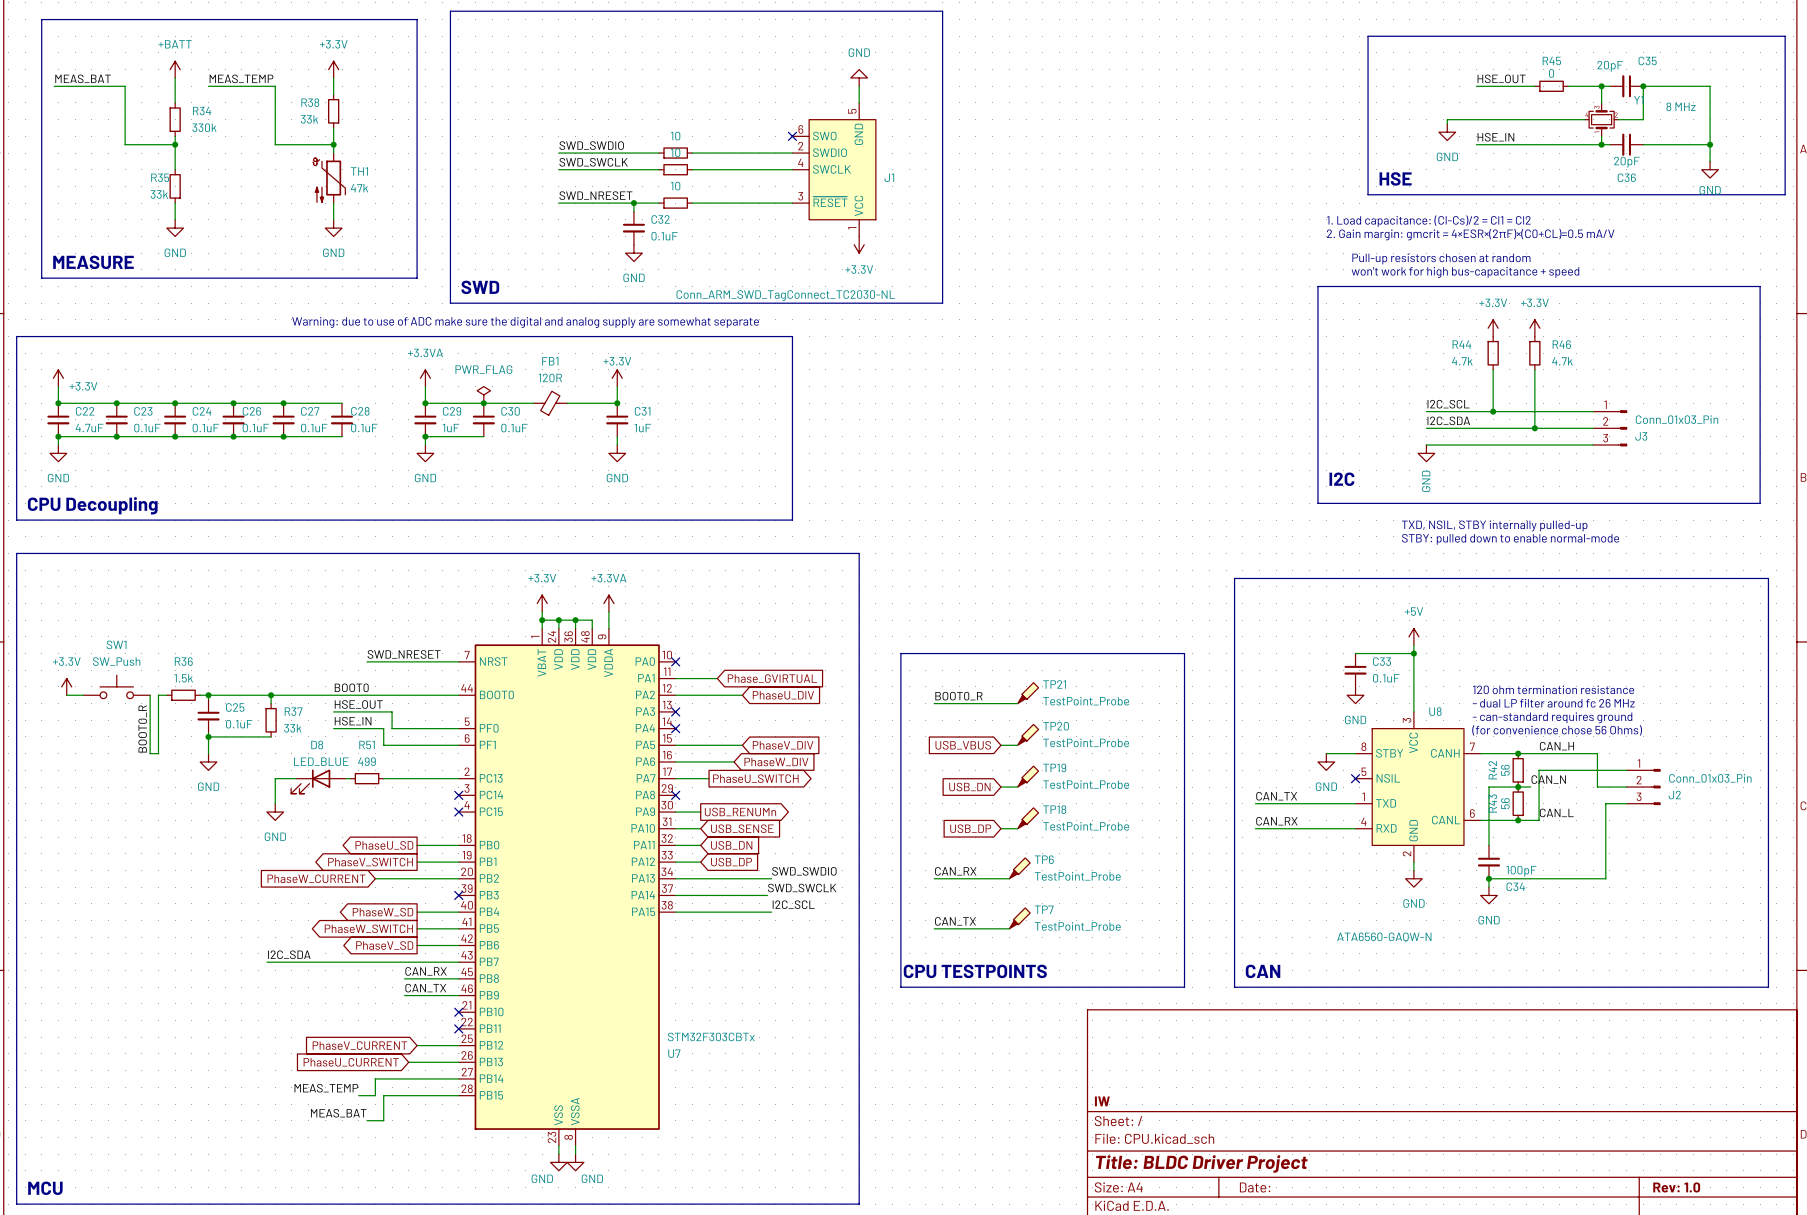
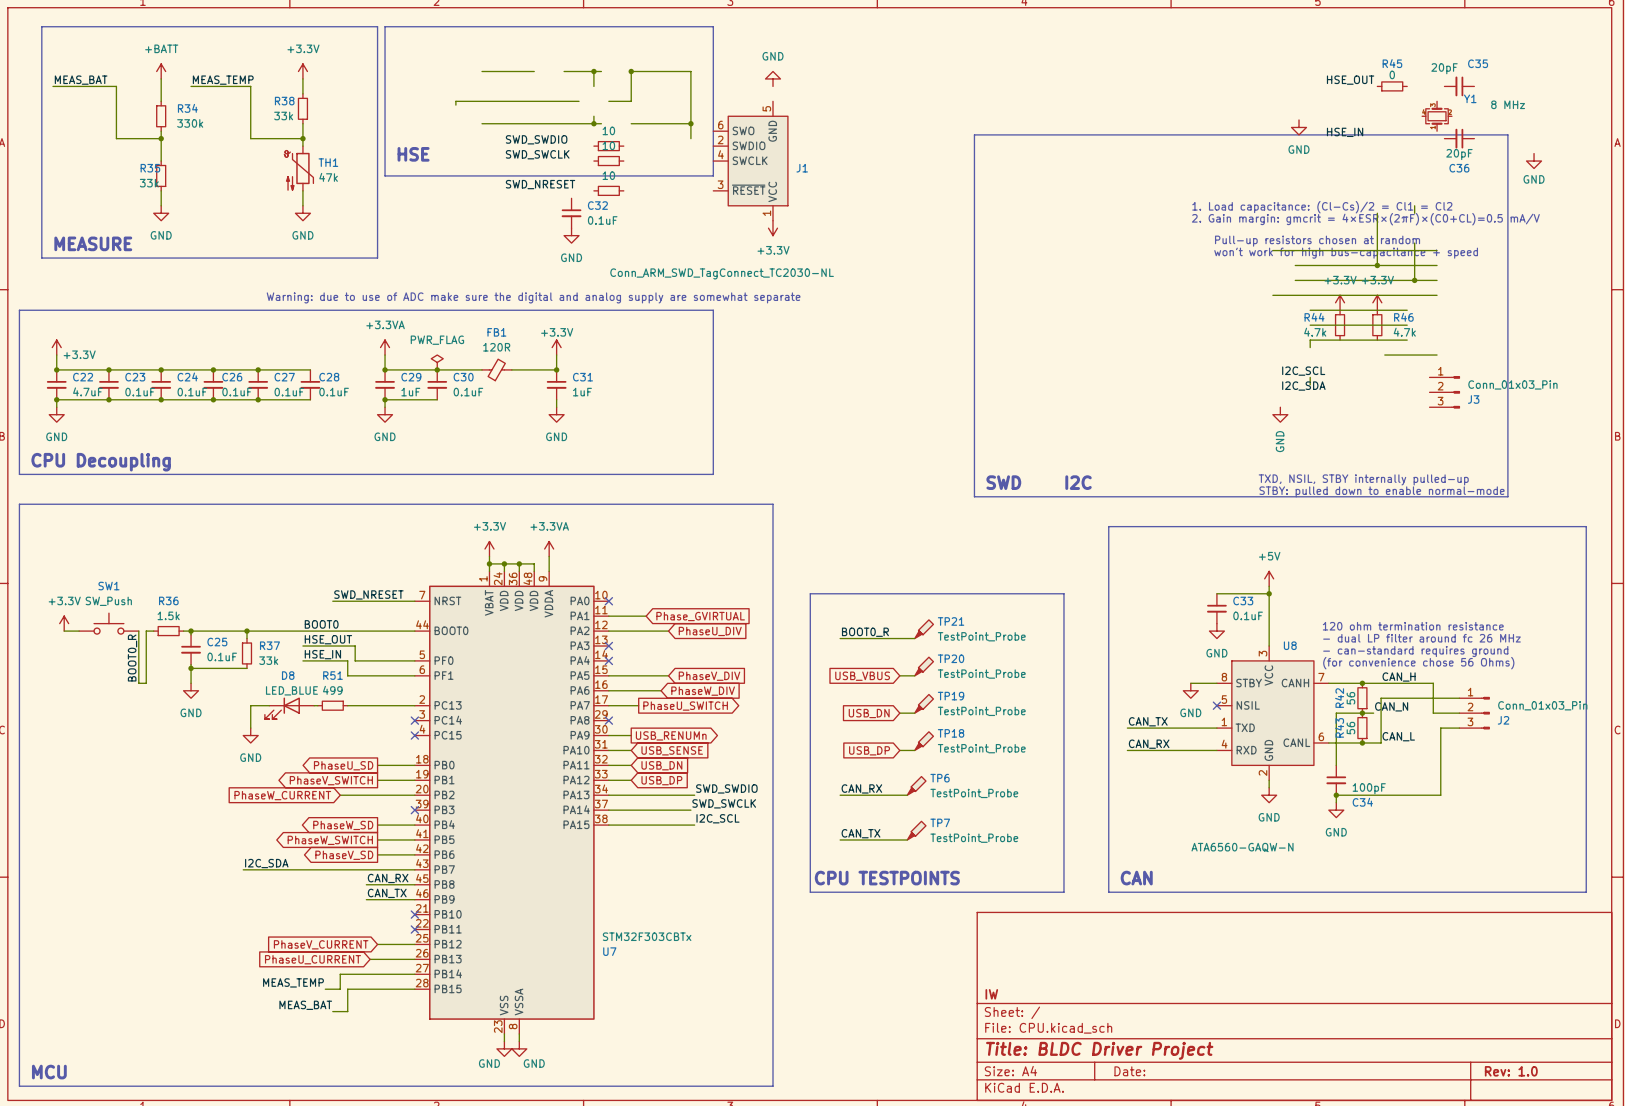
line: (450, 11) (942, 11) (942, 303) (450, 303) (450, 11) -> none
line: none -> (385, 26) (713, 26) (713, 175) (385, 175) (385, 26)
line: (1368, 36) (1785, 36) (1785, 194) (1368, 194) (1368, 36) -> none
wire: none -> (482, 71) (534, 71)
wire: none -> (564, 71) (601, 71)
wire: none -> (593, 71) (593, 86)
junction: none -> (593, 71)
junction: none -> (631, 71)
wire: (859, 86) (859, 102) -> none
wire: (1476, 86) (1534, 86) -> none
wire: (1568, 86) (1609, 86) -> none
wire: (1601, 86) (1601, 102) -> none
junction: (1601, 86) -> none
junction: (1643, 86) -> none
wire: none -> (579, 101) (455, 101) (455, 105)
wire: none -> (608, 101) (631, 101) (631, 71) (690, 71) (690, 138)
wire: (1584, 119) (1447, 119) (1447, 123) -> none
wire: (1618, 119) (1643, 119) (1643, 86) (1710, 86) (1710, 161) -> none
wire: none -> (482, 123) (601, 123)
junction: none -> (593, 123)
wire: none -> (631, 123) (690, 123)
junction: none -> (690, 123)
no-connect mark: (792, 136) -> none
wire: (1601, 136) (1601, 144) -> (1414, 205) (1414, 213)
line: none -> (974, 134) (1507, 134) (1507, 496) (974, 496) (974, 134)
wire: (1476, 144) (1609, 144) -> none
junction: (1601, 144) -> none
wire: (1643, 144) (1710, 144) -> none
junction: (1710, 144) -> none
wire: (558, 153) (658, 153) -> none
wire: (692, 153) (792, 153) -> none
text: none -> HSE (413, 154)
wire: (558, 169) (658, 169) -> none
wire: (692, 169) (792, 169) -> none
text: HSE (1395, 178) -> none
wire: (558, 203) (658, 203) -> none
wire: (633, 203) (633, 211) -> (593, 116) (593, 123)
junction: (633, 203) -> none
wire: (692, 203) (792, 203) -> none
wire: none -> (1272, 250) (1437, 250)
line: (1317, 286) (1760, 286) (1760, 503) (1317, 503) (1317, 286) -> none
junction: none -> (1377, 265)
text: SWD (480, 287) -> none
wire: none -> (1295, 280) (1437, 280)
junction: none -> (1414, 280)
wire: none -> (1272, 295) (1437, 295)
wire: none -> (1310, 310) (1407, 310)
wire: none -> (1310, 325) (1407, 325)
wire: (1493, 369) (1493, 411) -> (1414, 243) (1414, 280)
wire: (1534, 369) (1534, 428) -> (1377, 213) (1377, 265)
wire: none -> (1407, 340) (1310, 340) (1310, 347)
wire: none -> (1384, 355) (1437, 355)
wire: (1426, 411) (1593, 411) -> none
wire: none -> (1310, 377) (1310, 384)
junction: (1493, 411) -> none
wire: (1426, 428) (1593, 428) -> none
junction: (1534, 428) -> none
wire: (1426, 445) (1593, 445) -> none
text position: I2C (1341, 479) -> I2C (1078, 482)
text: none -> SWD (1003, 482)

